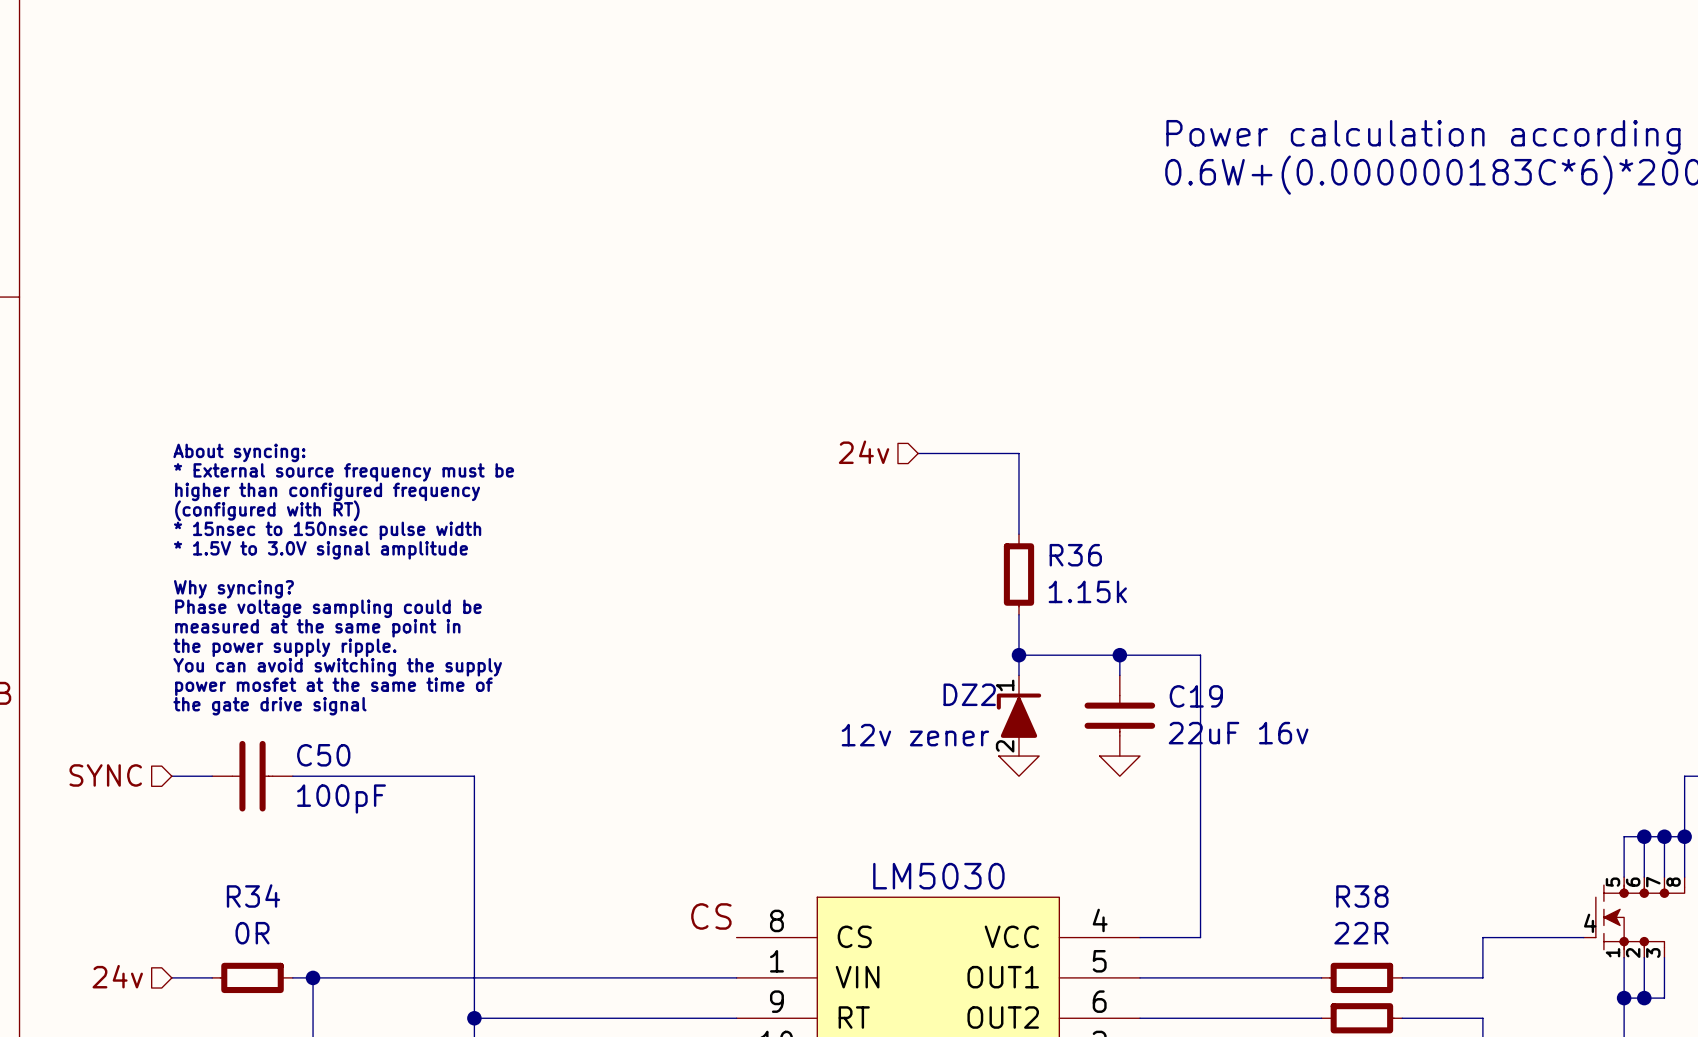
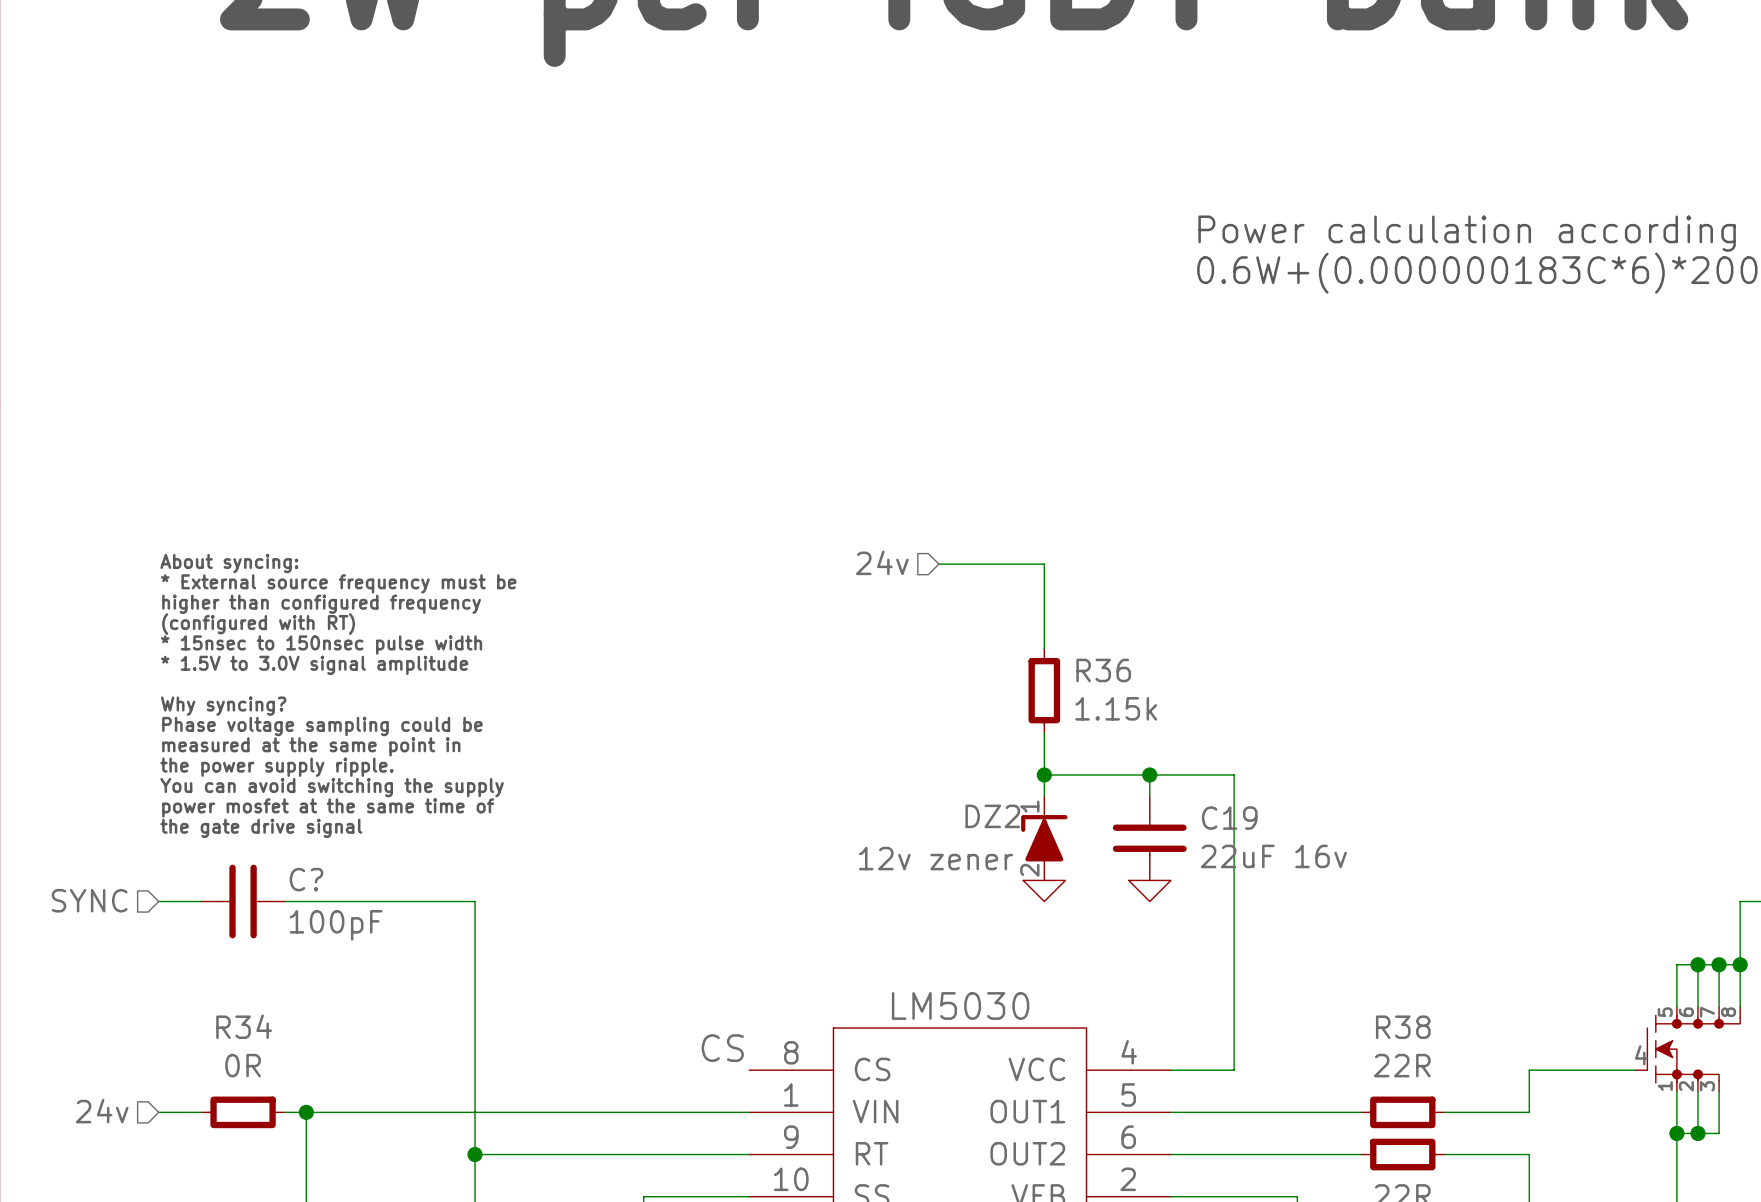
C50 name: C50 (323, 755) -> C? (306, 879)

